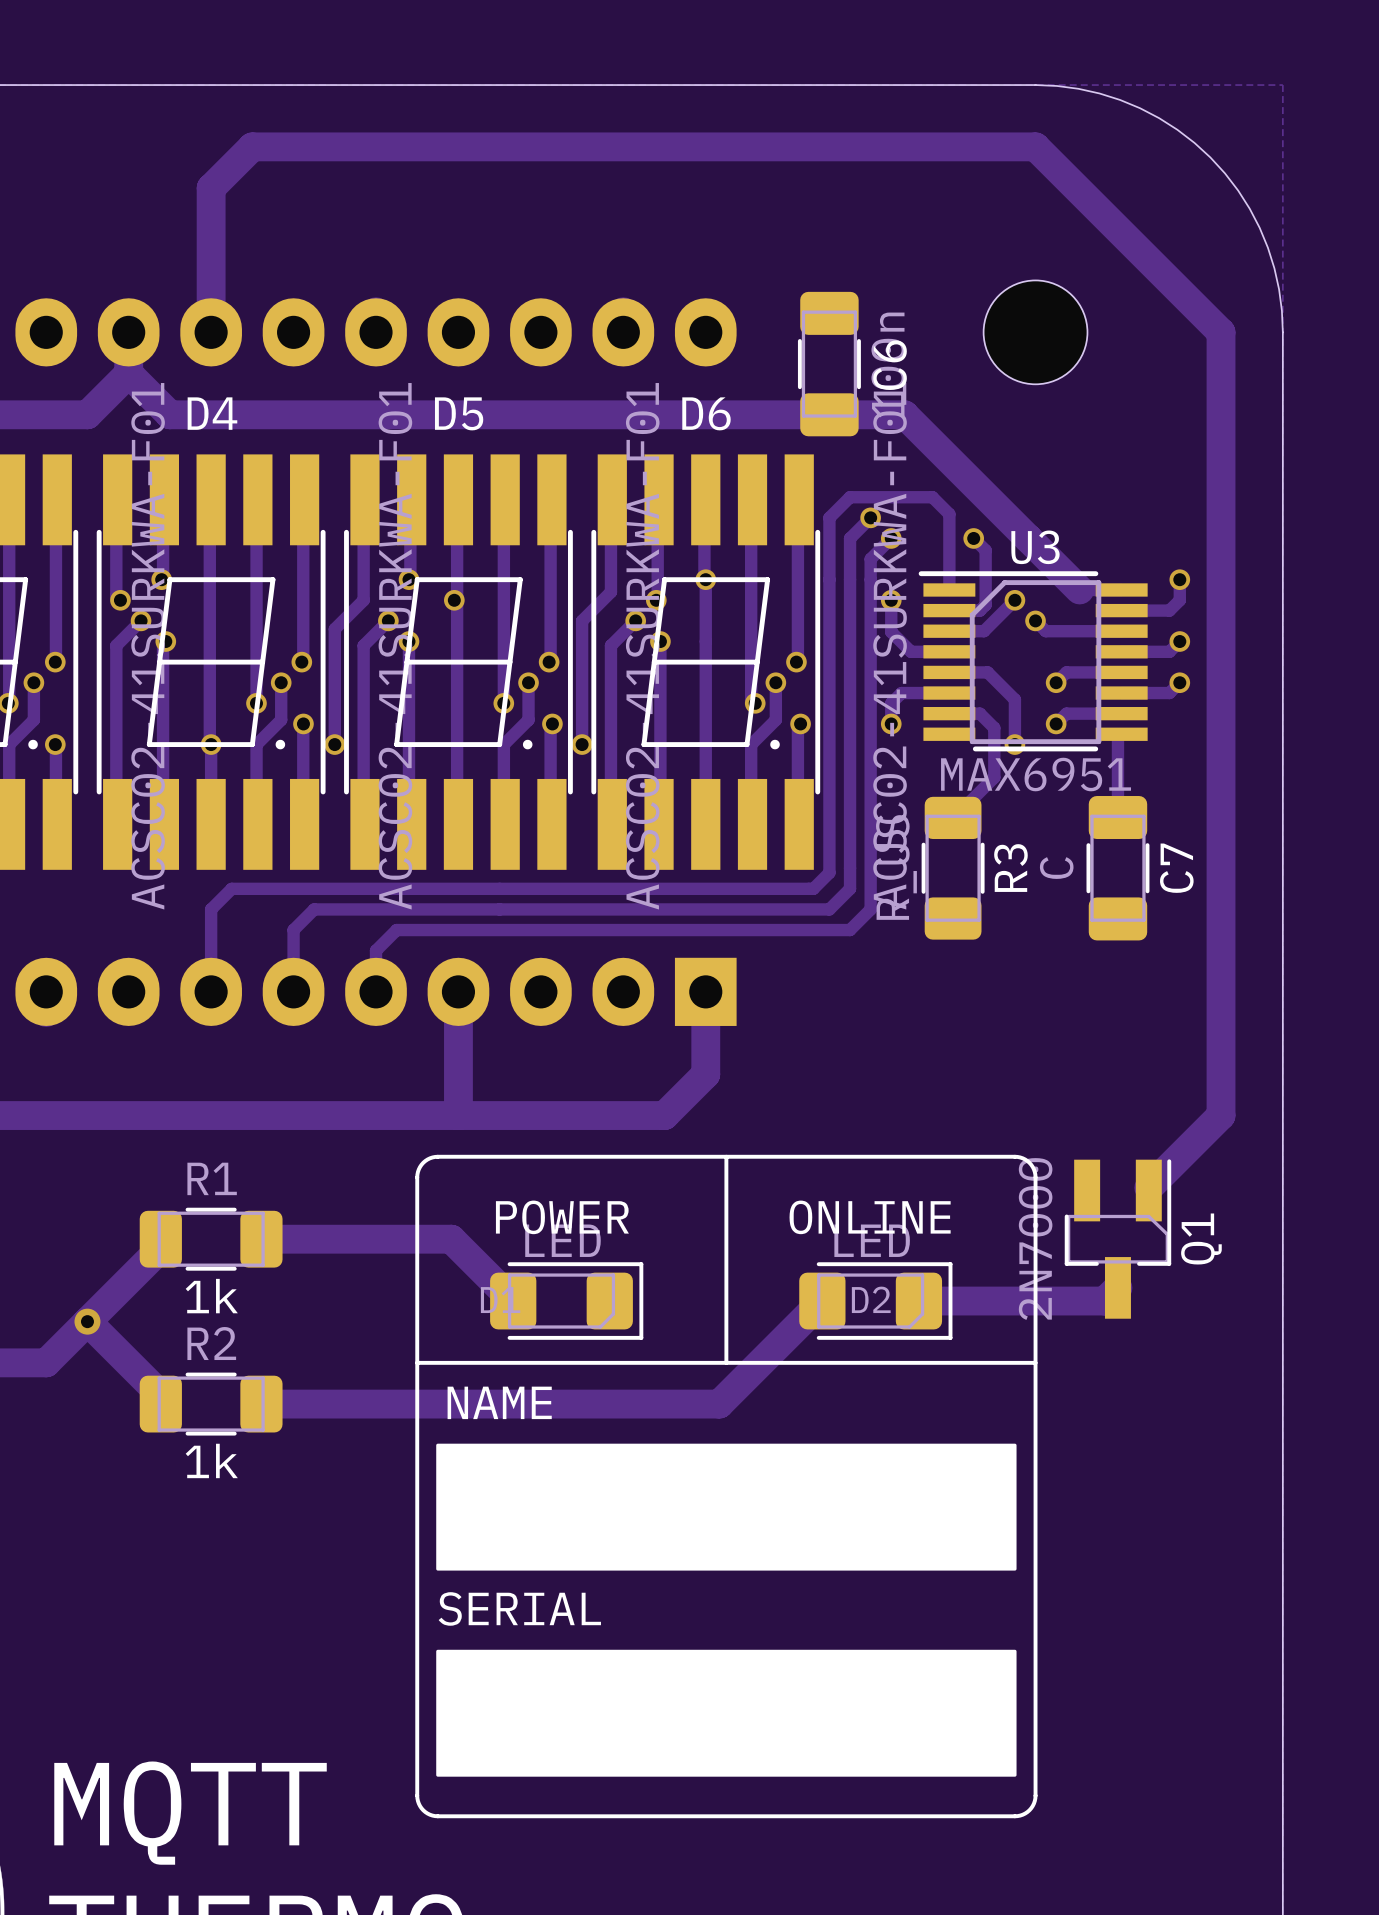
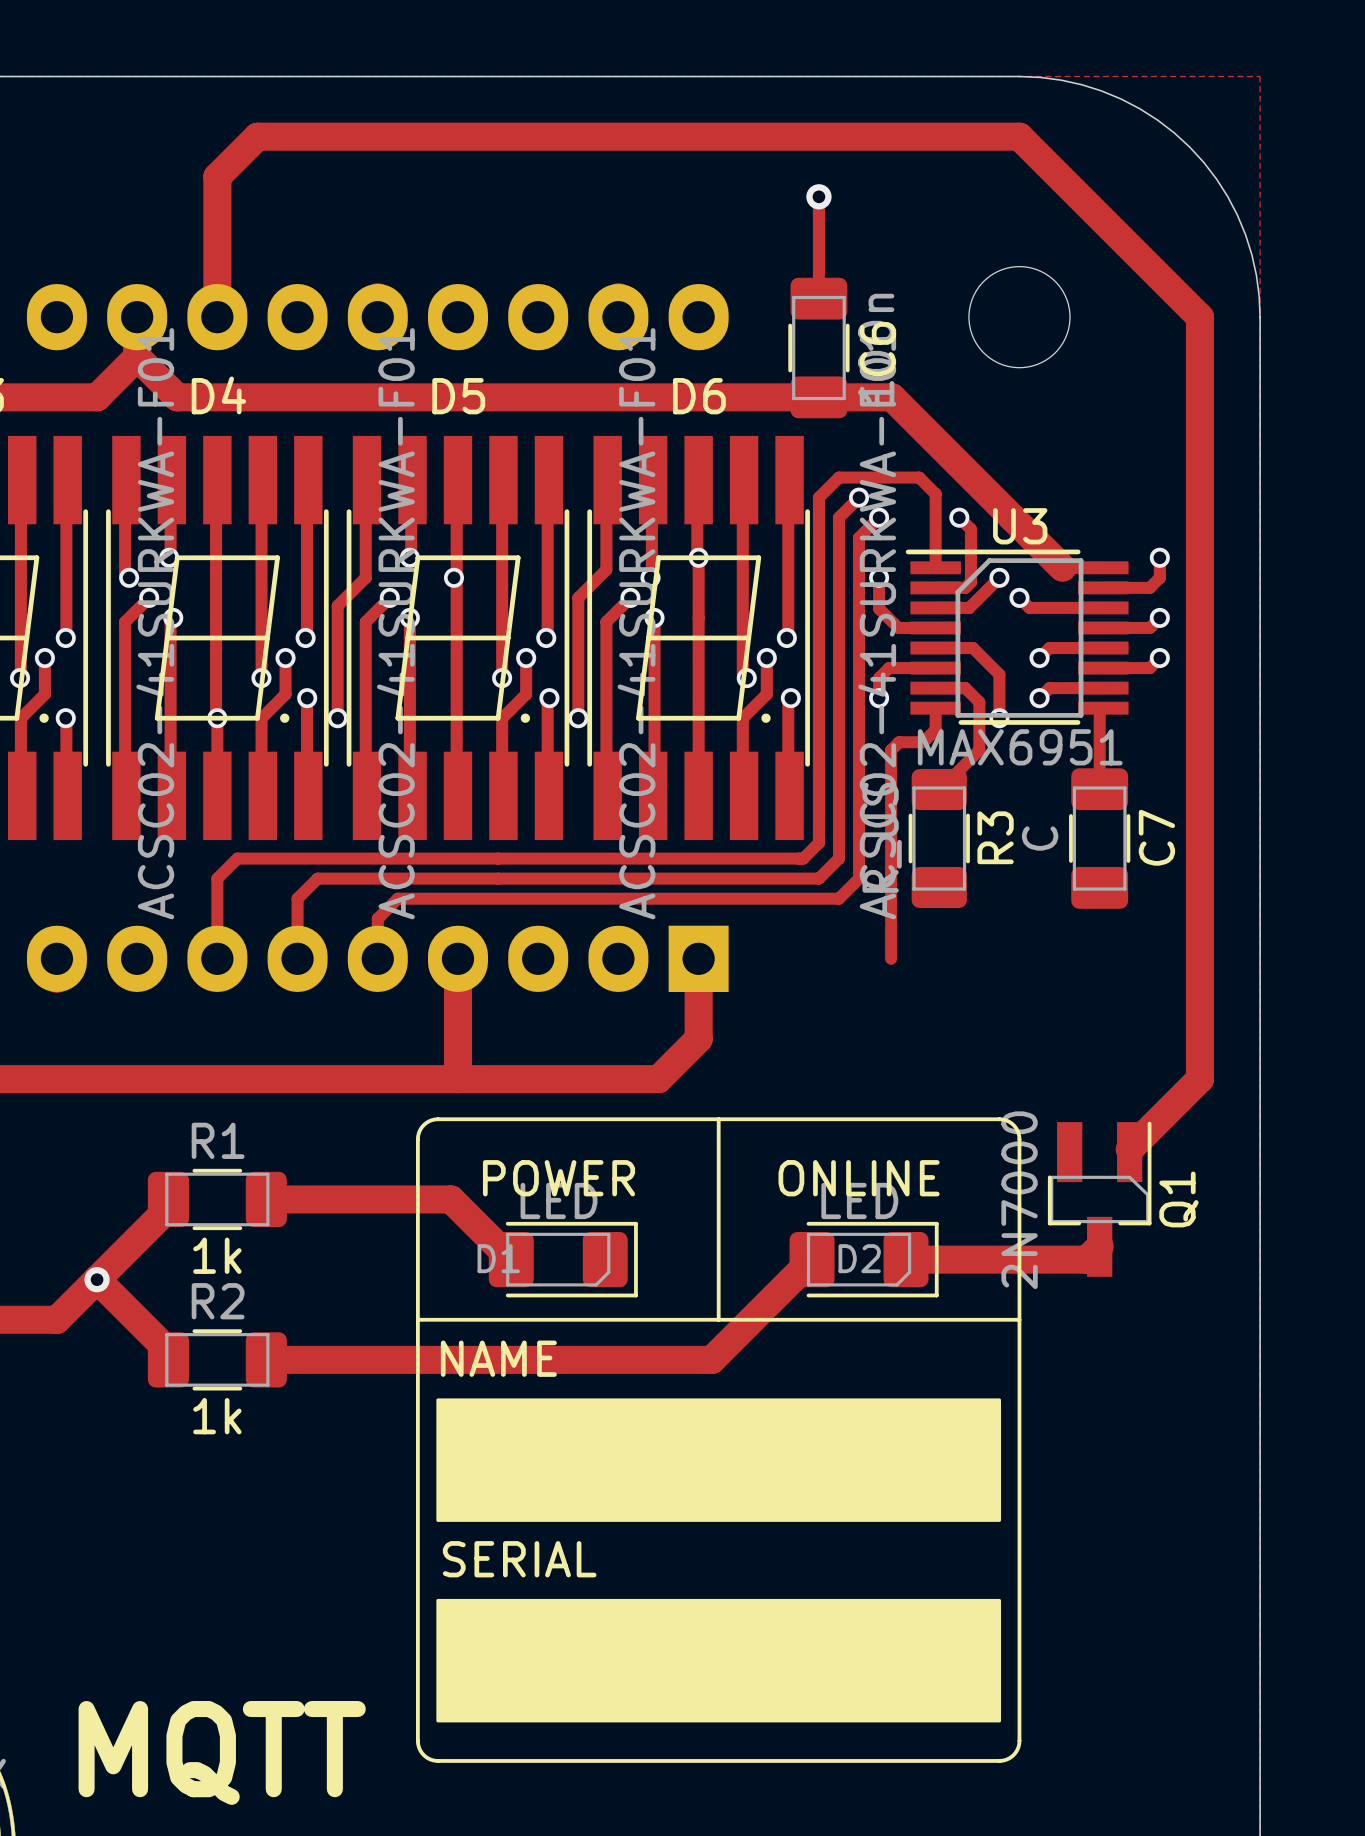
track: none -> (818, 196) (818, 298)
via: none -> (818, 196)
track: none -> (935, 708) (935, 729) (923, 742) (899, 742) (891, 750) (891, 958)

